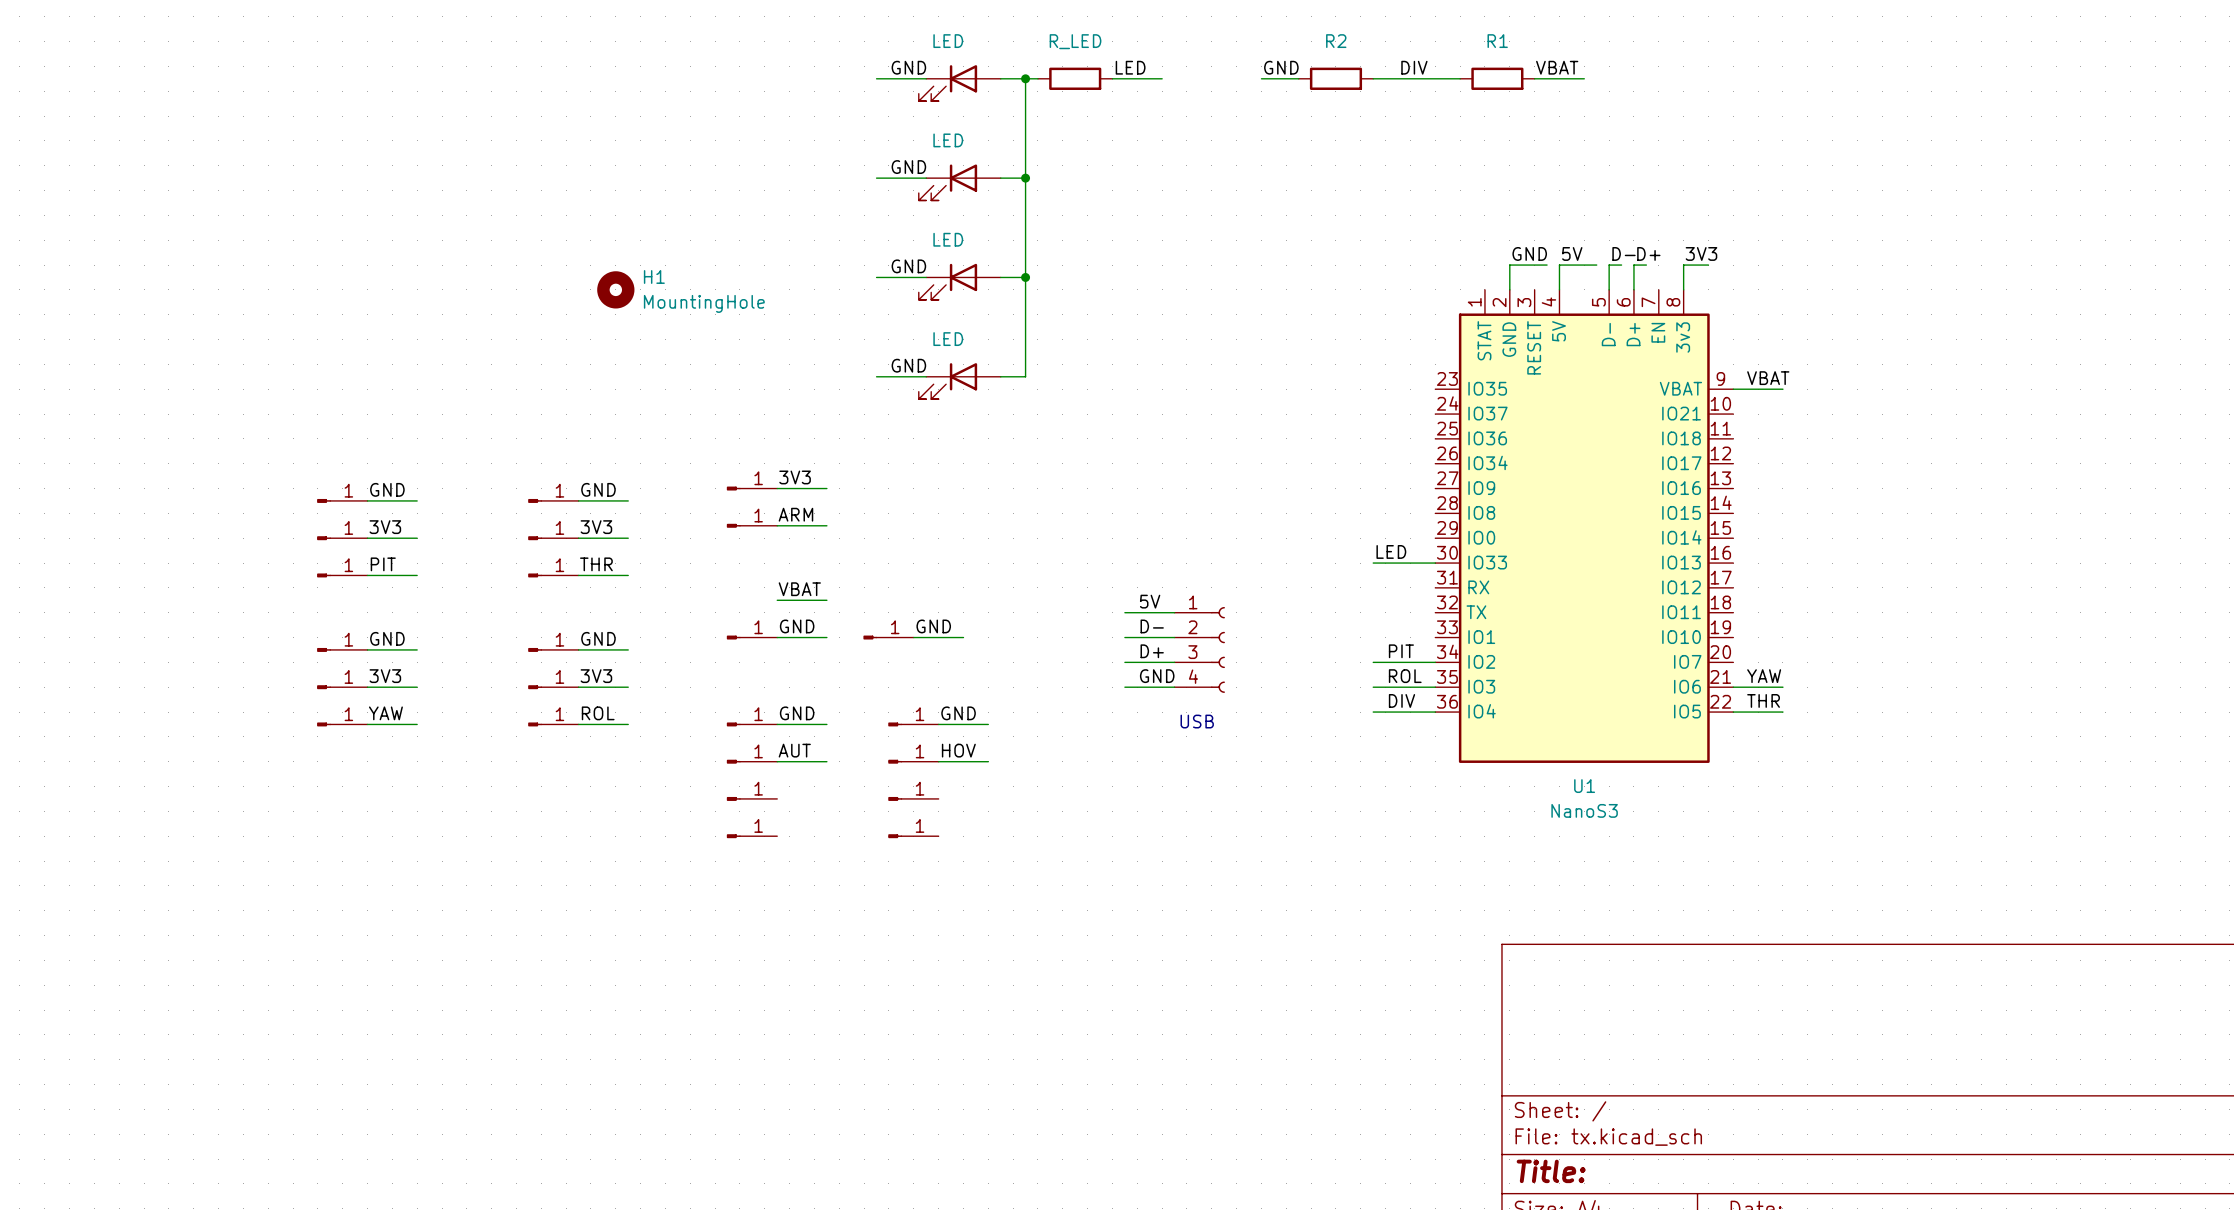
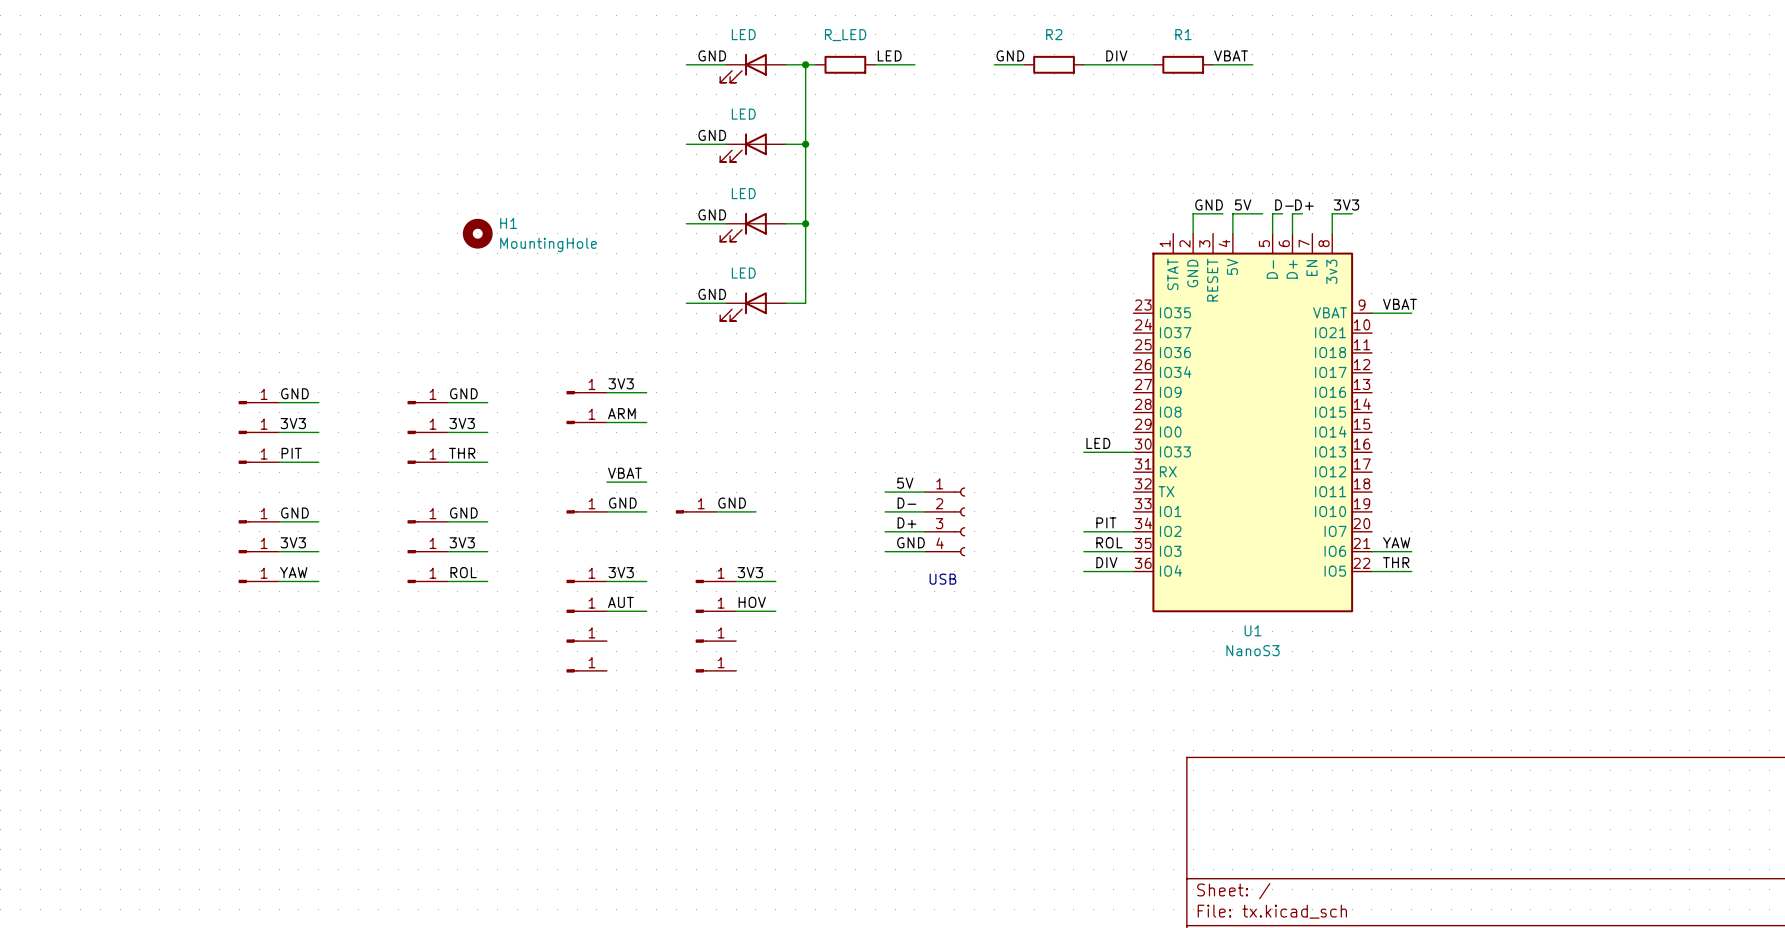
label: GND (797, 713) -> 3V3 (621, 572)
label: GND (958, 713) -> 3V3 (750, 572)

